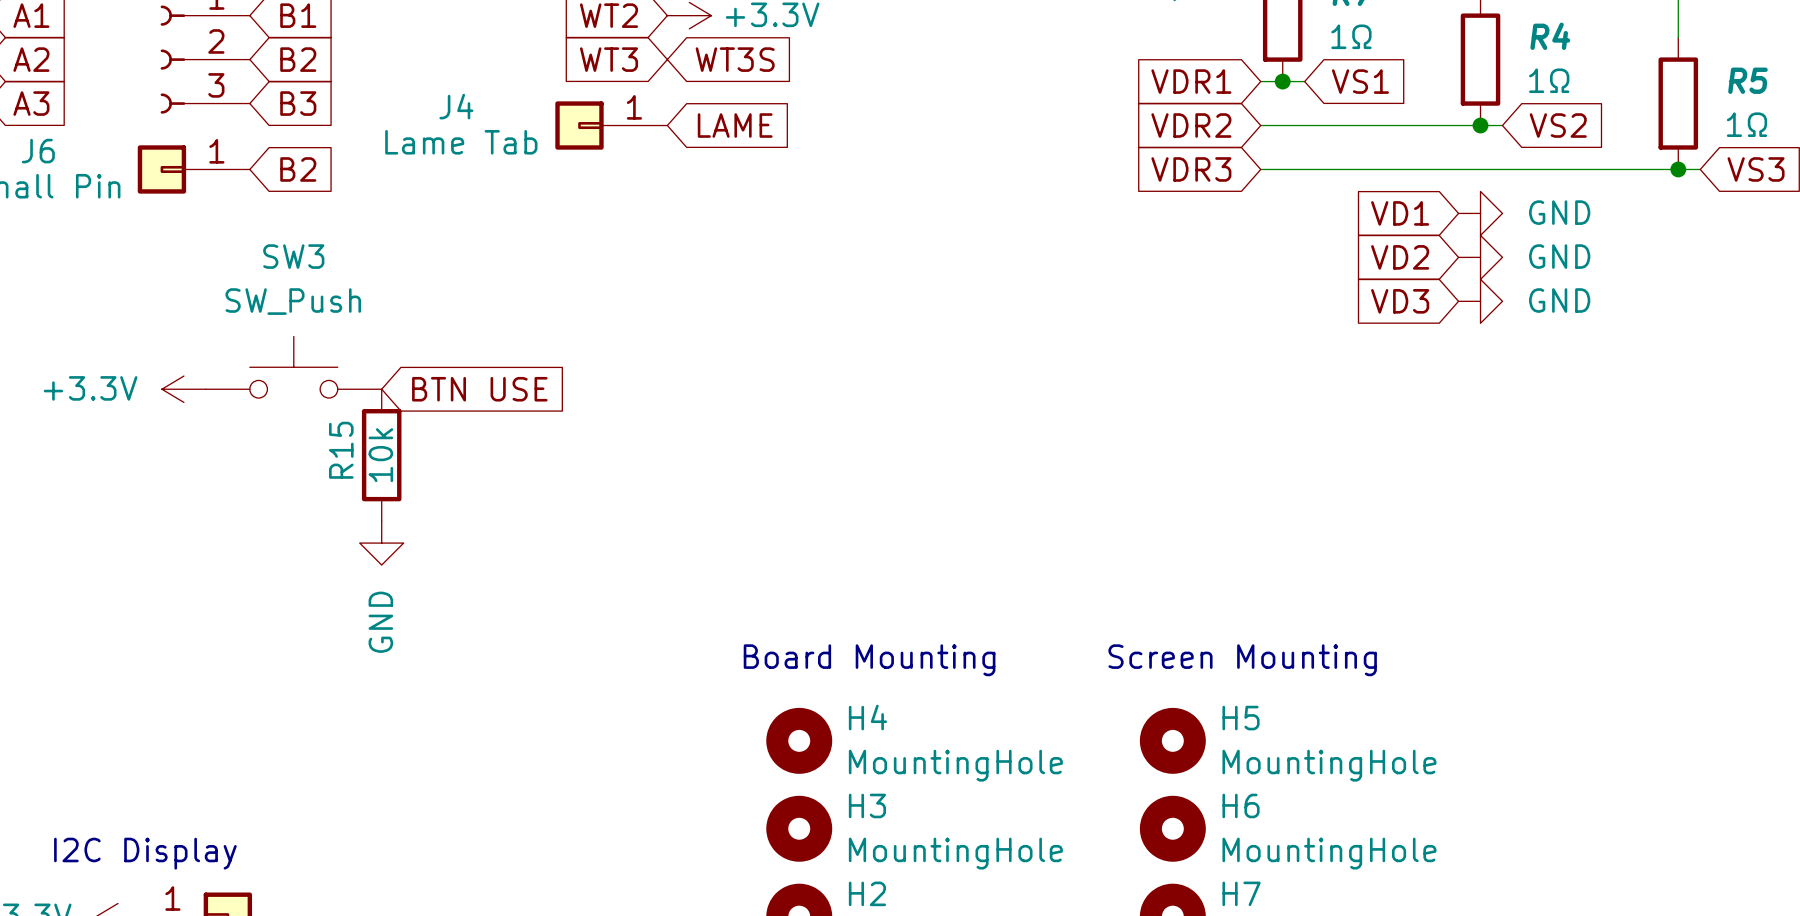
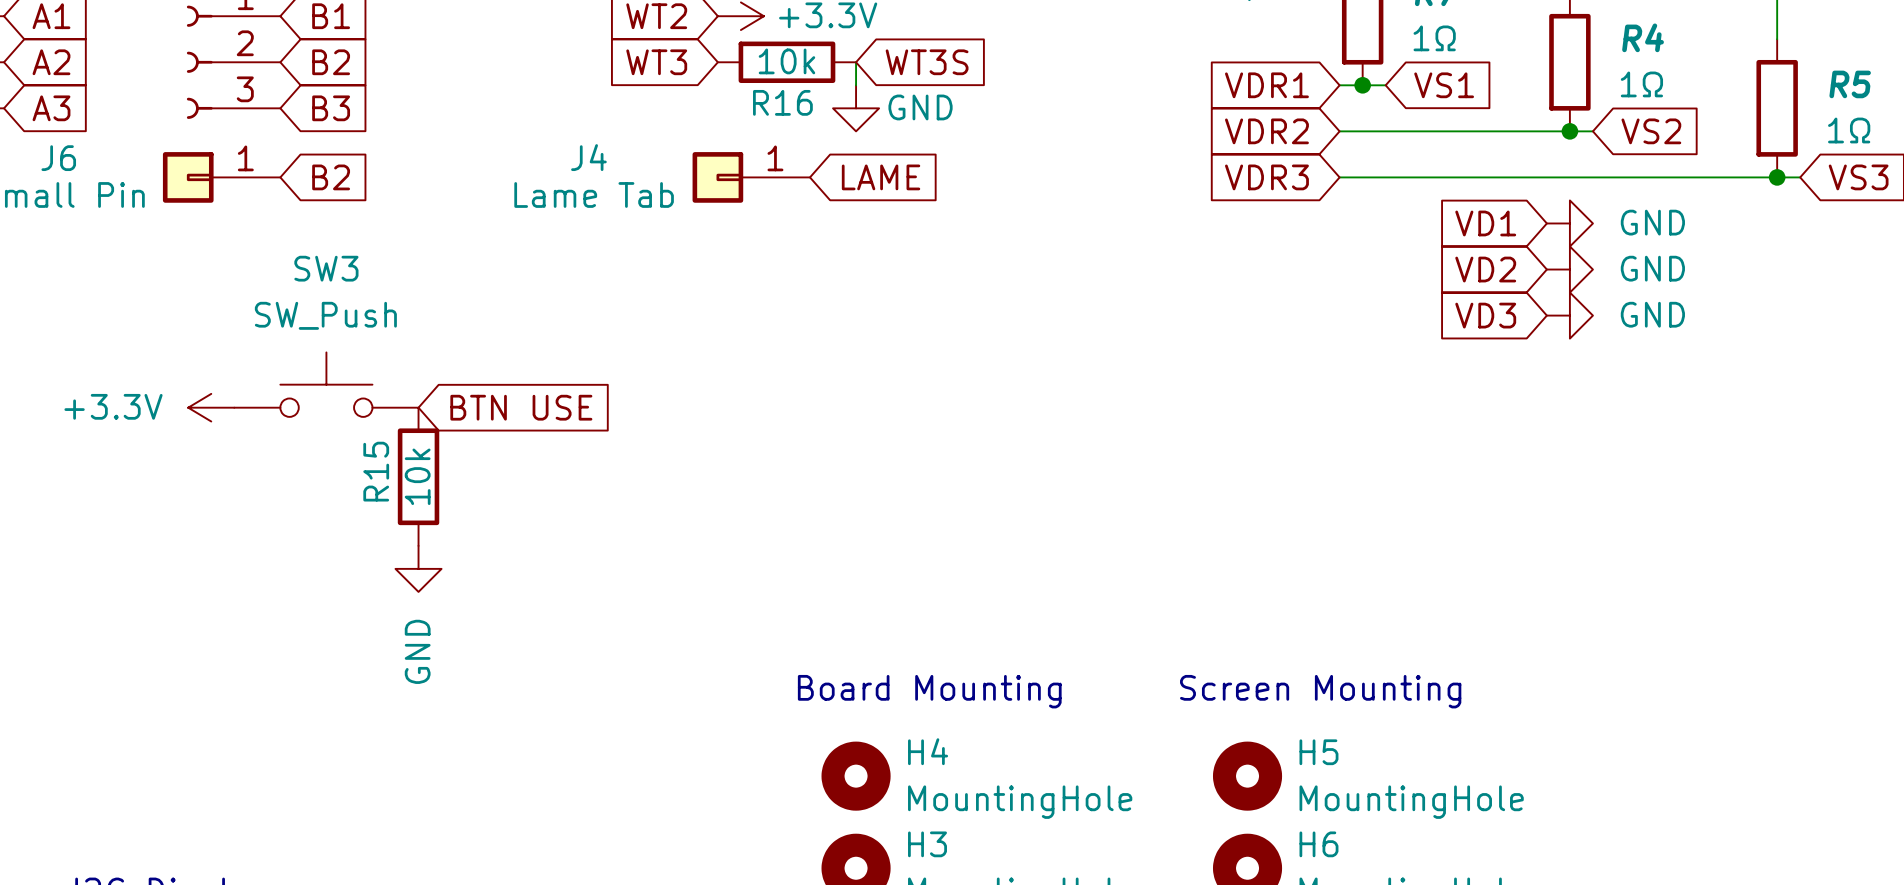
R16: none -> 10k (786, 62)
global label position: WT3S (735, 59) -> WT3S (927, 62)
wire: none -> (856, 62) (856, 85)
power symbol: none -> GND (856, 108)
J4 position: (611, 125) -> (751, 177)
global label position: LAME (735, 125) -> LAME (881, 177)

